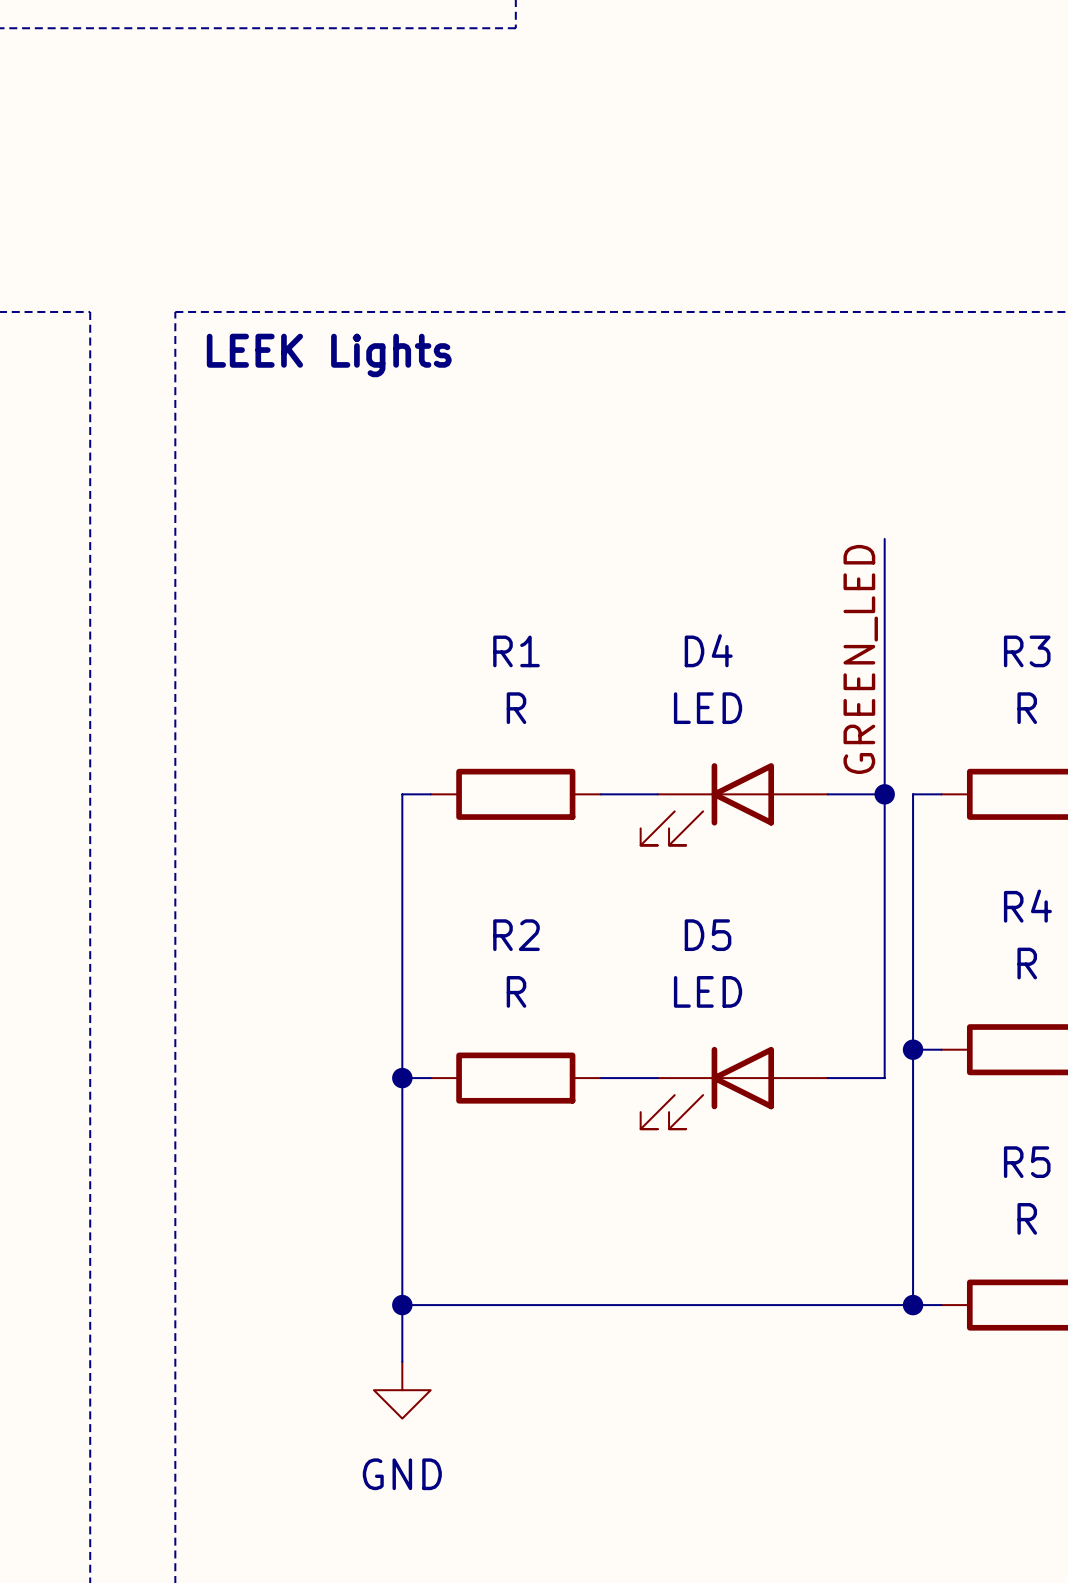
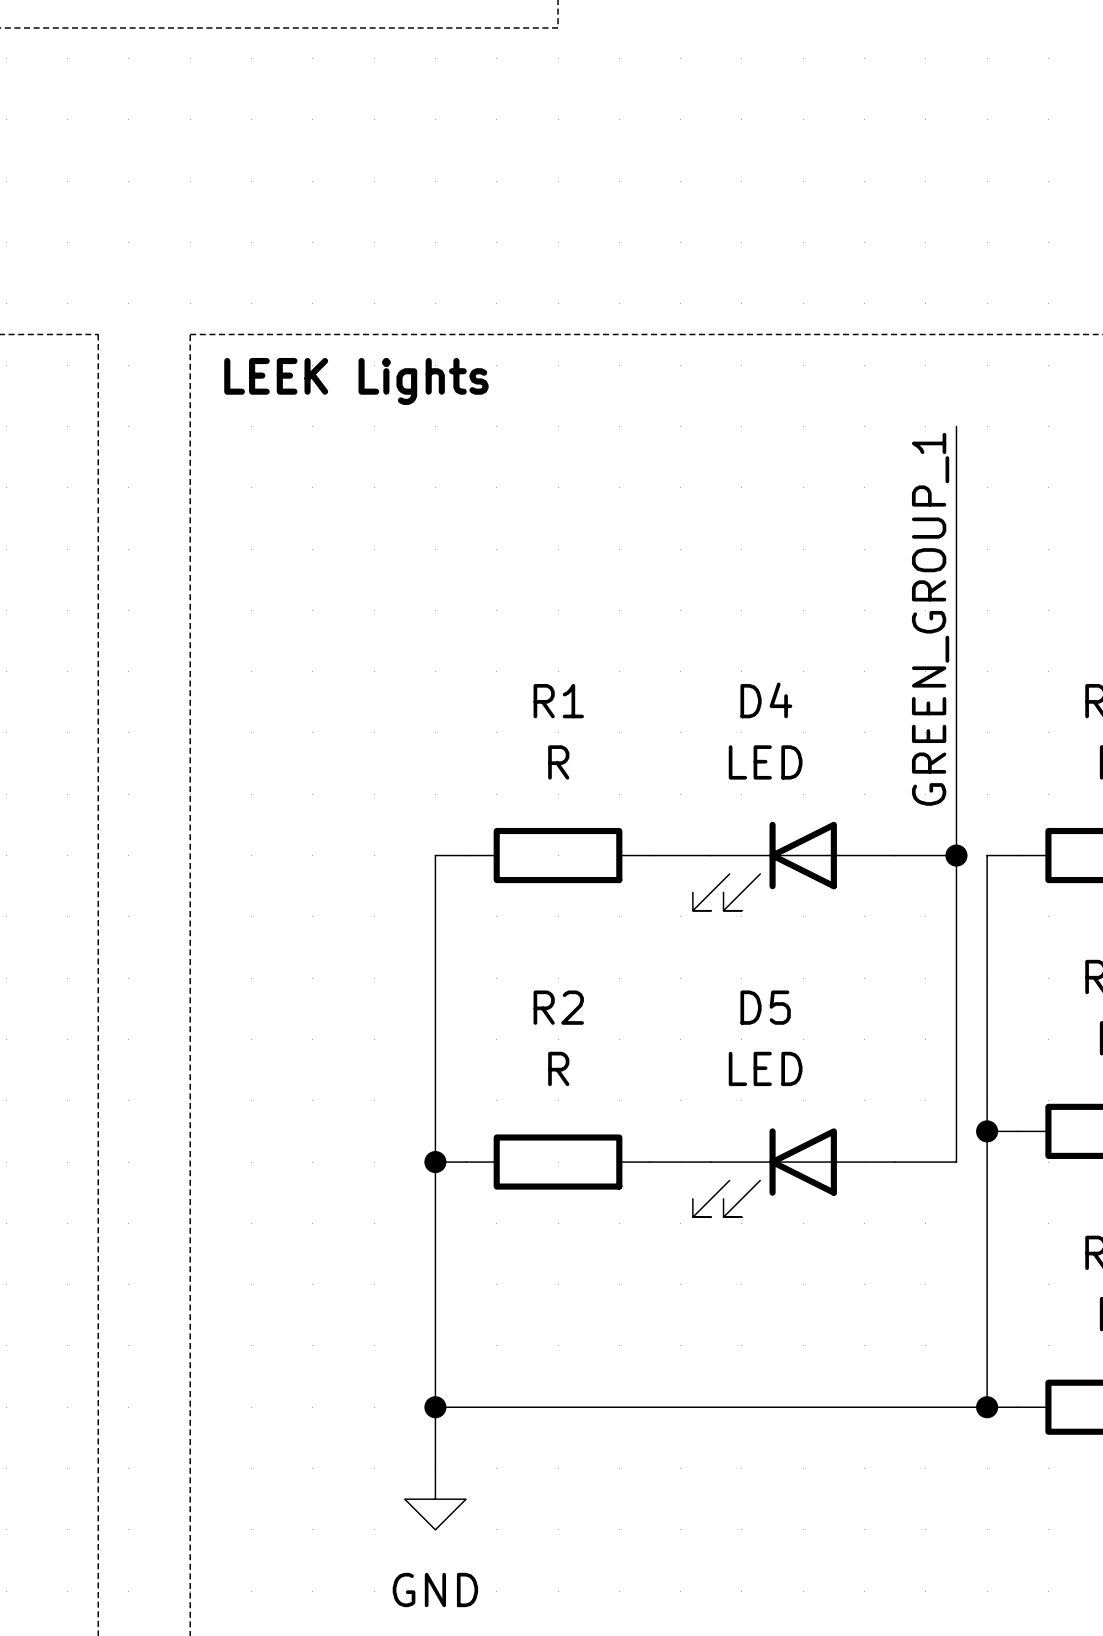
wire: none -> (956, 426) (956, 579)
label: none -> GREEN_GROUP_1 (930, 619)
label: GREEN_LED (860, 659) -> none

